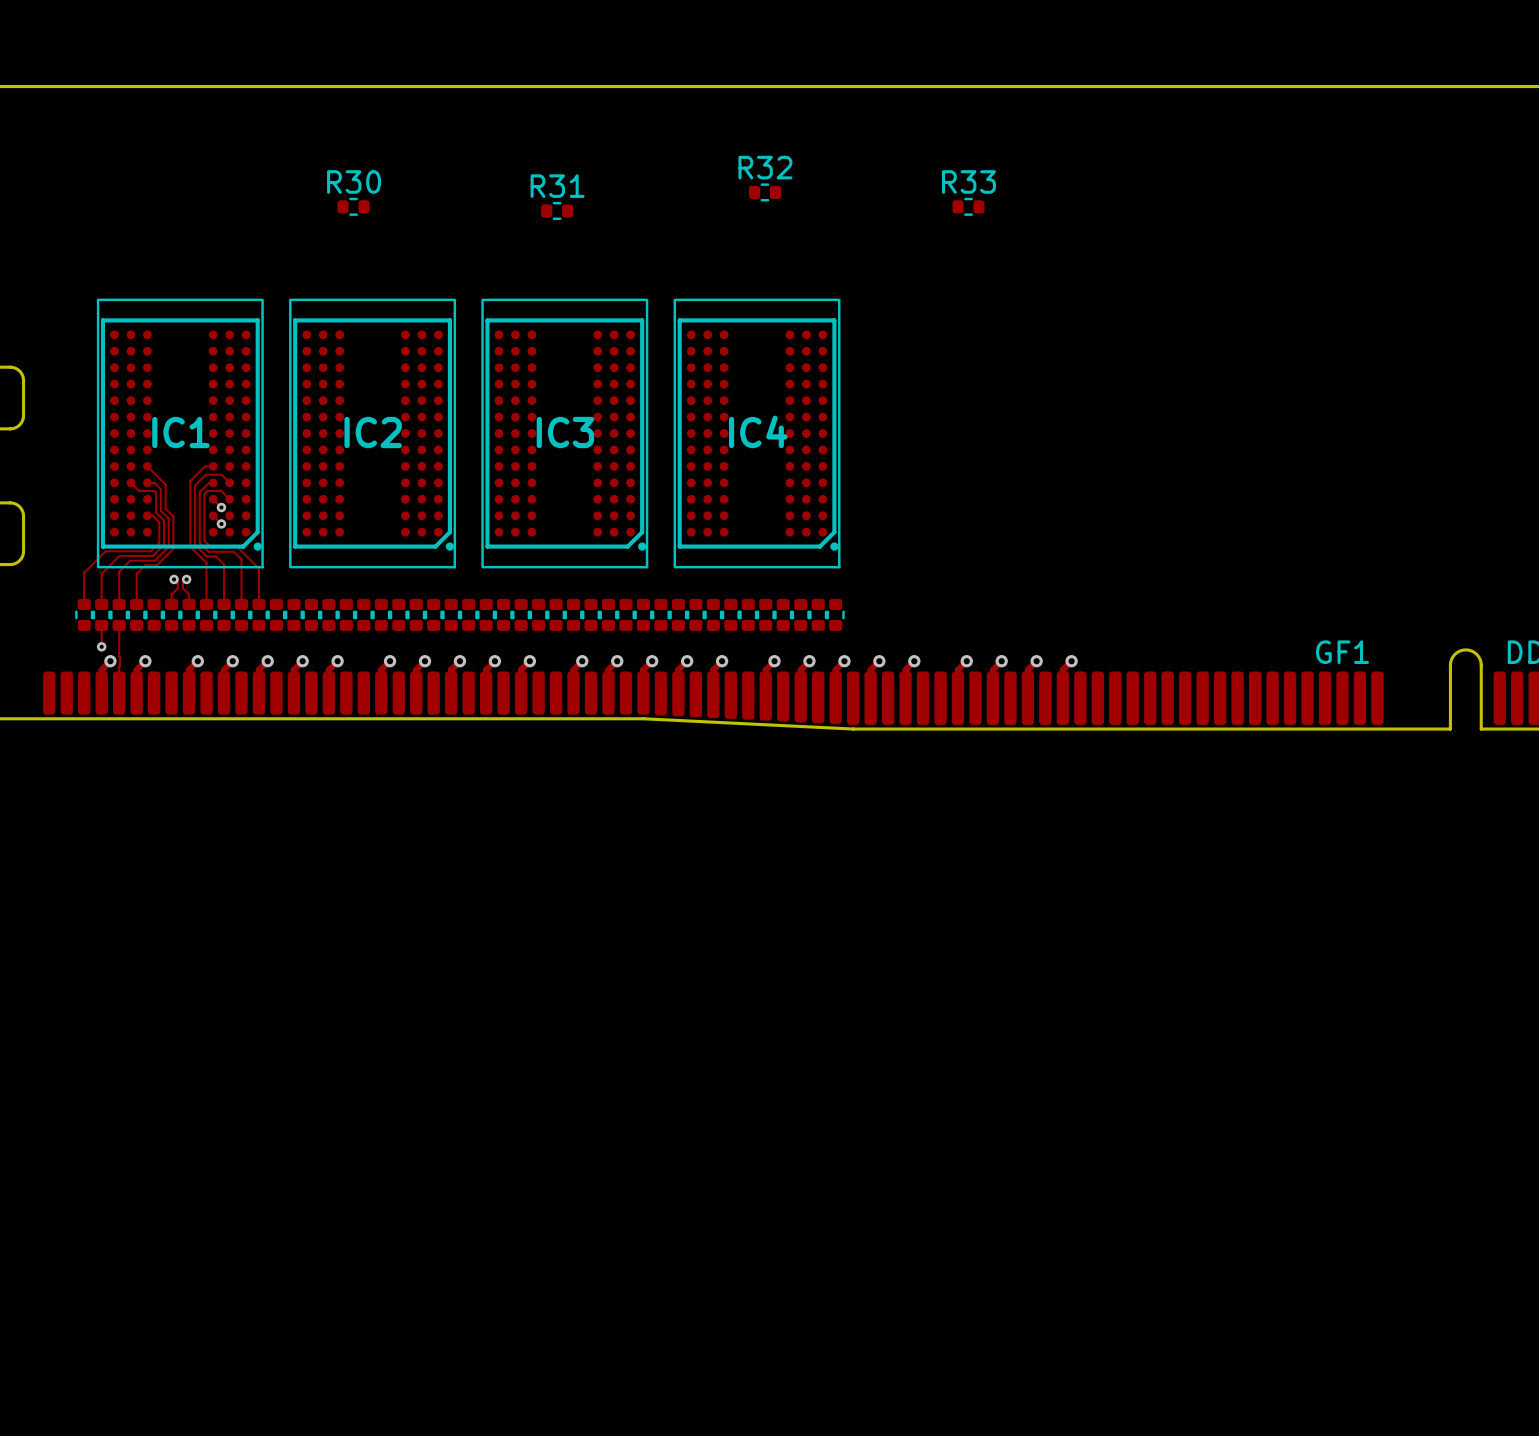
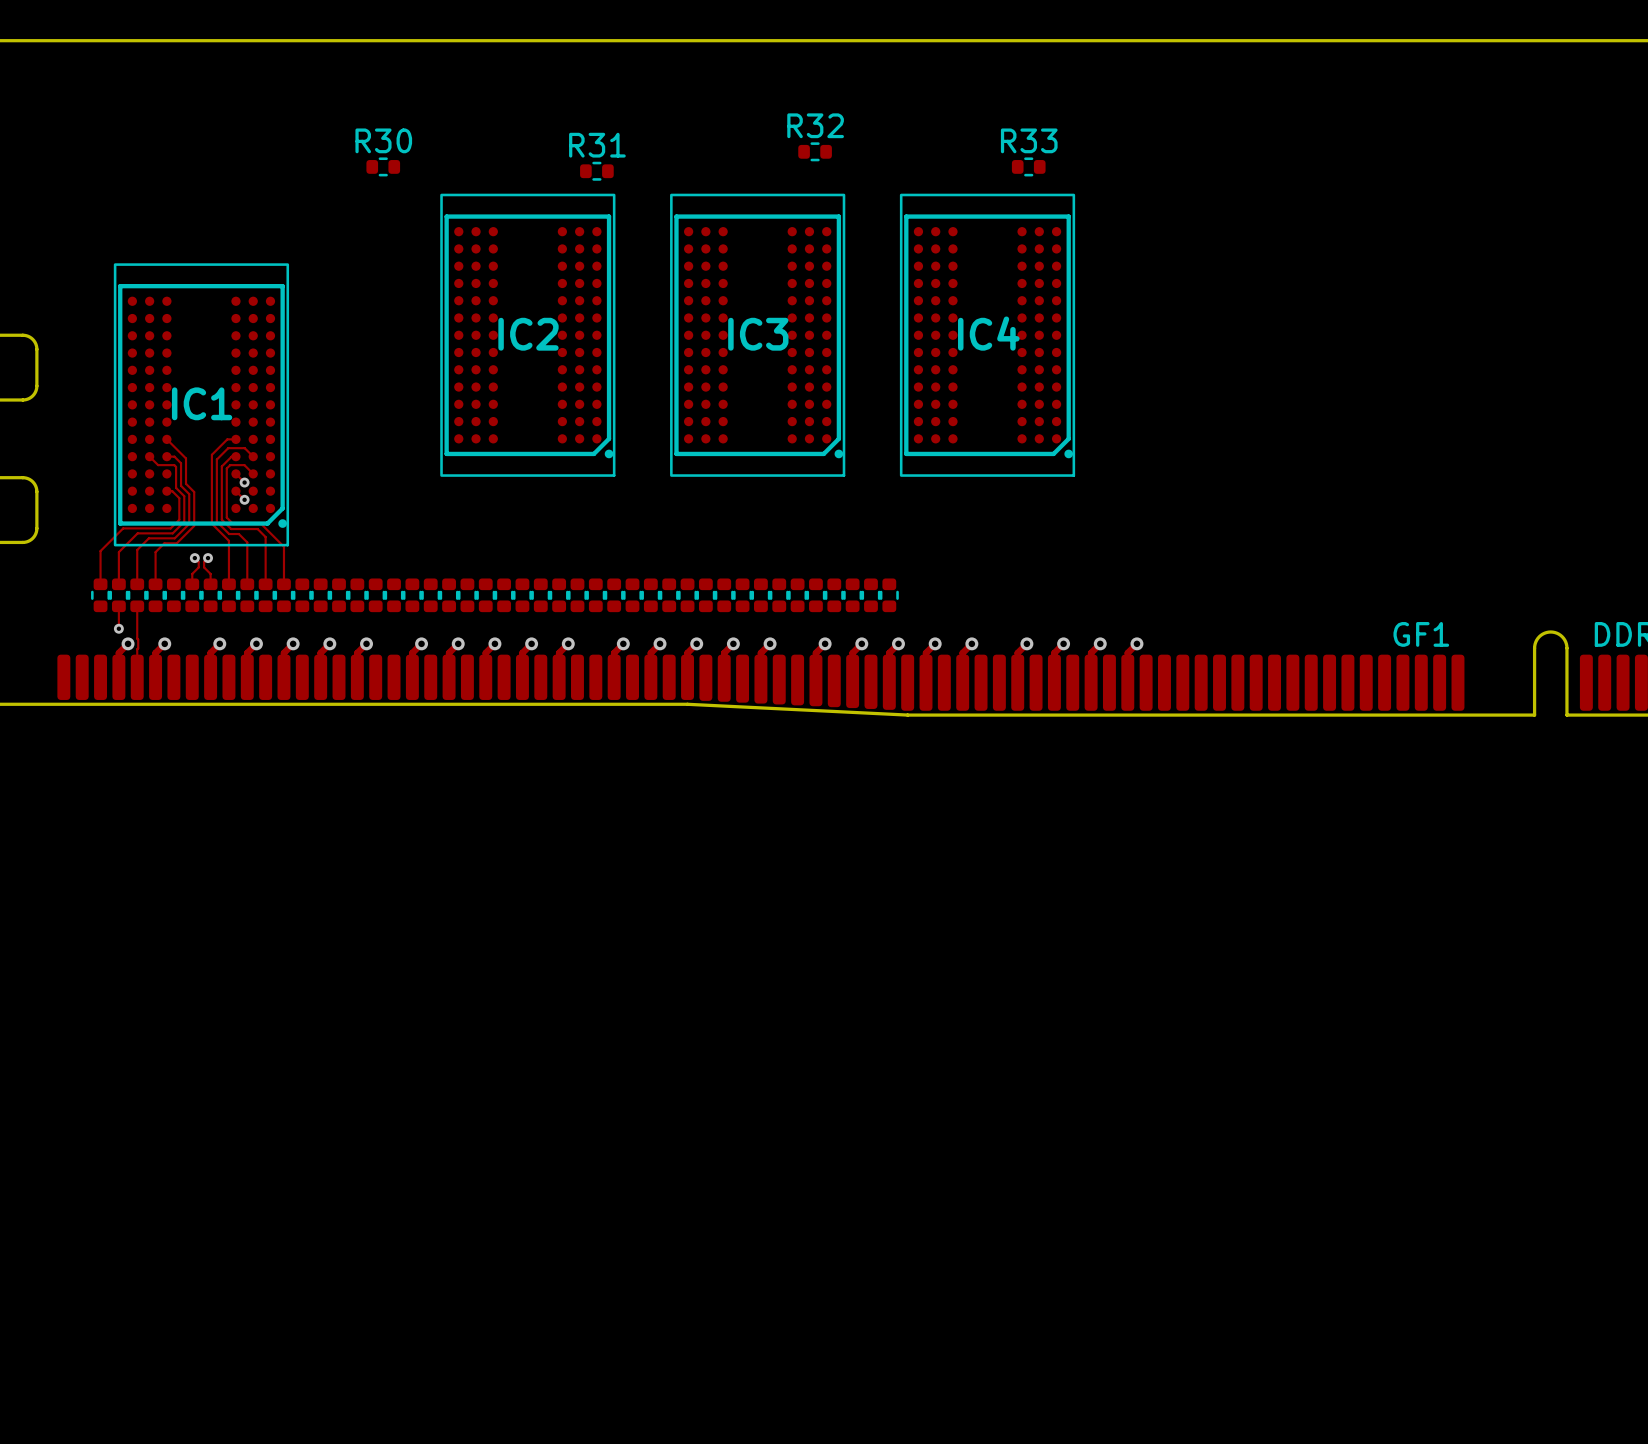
IC2 position: (372, 433) -> (527, 335)
IC3 position: (564, 433) -> (757, 335)
IC4 position: (757, 433) -> (987, 335)

